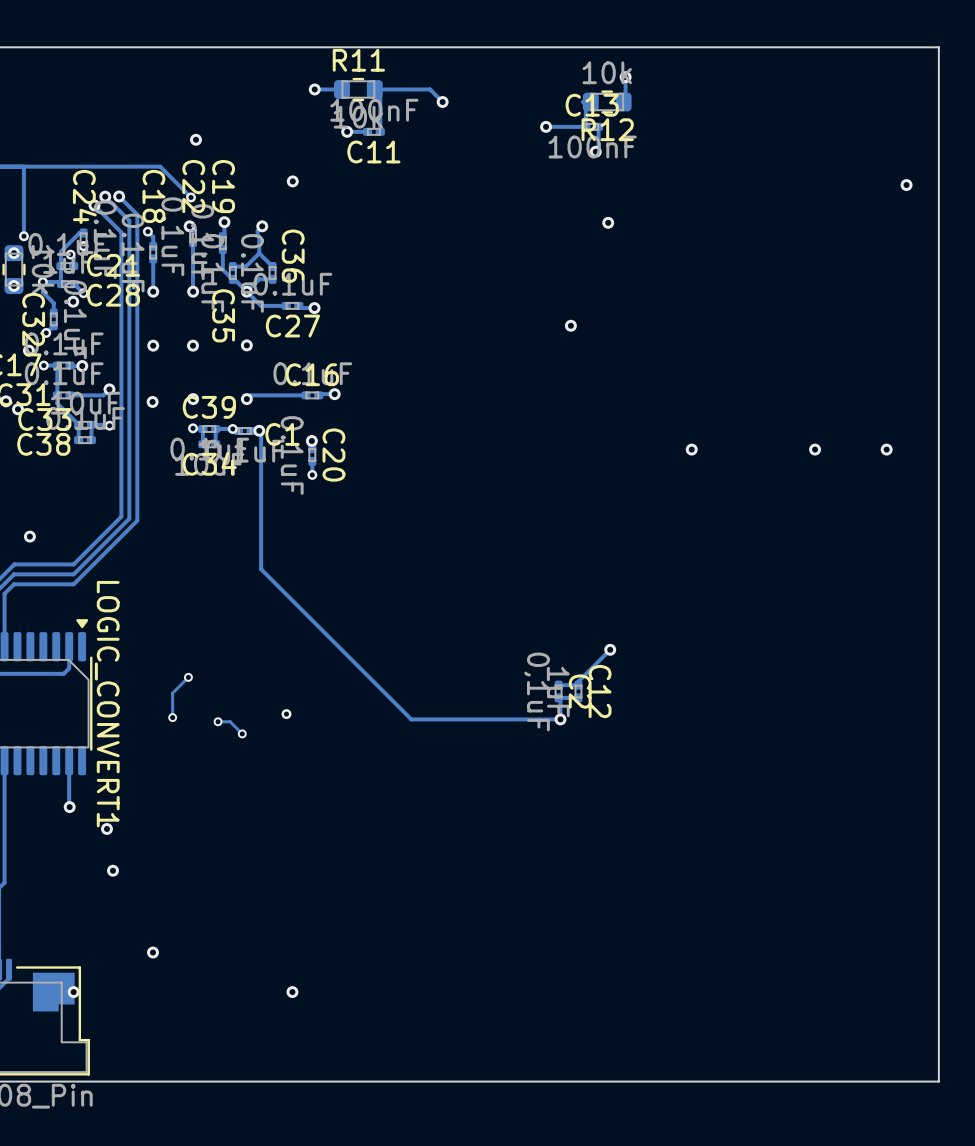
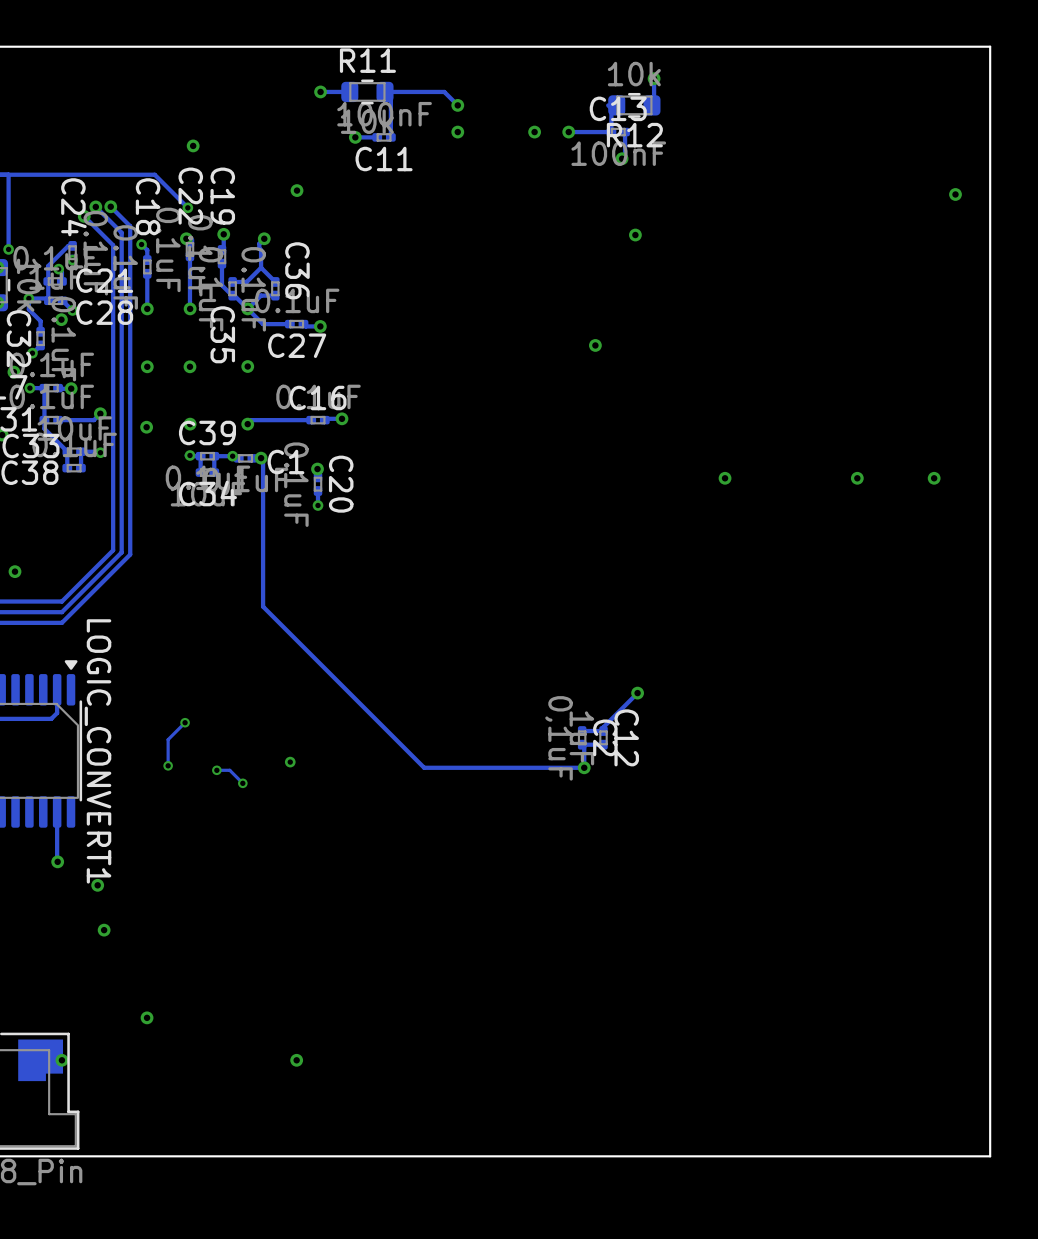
via: none -> (457, 132)
via: none -> (534, 132)

